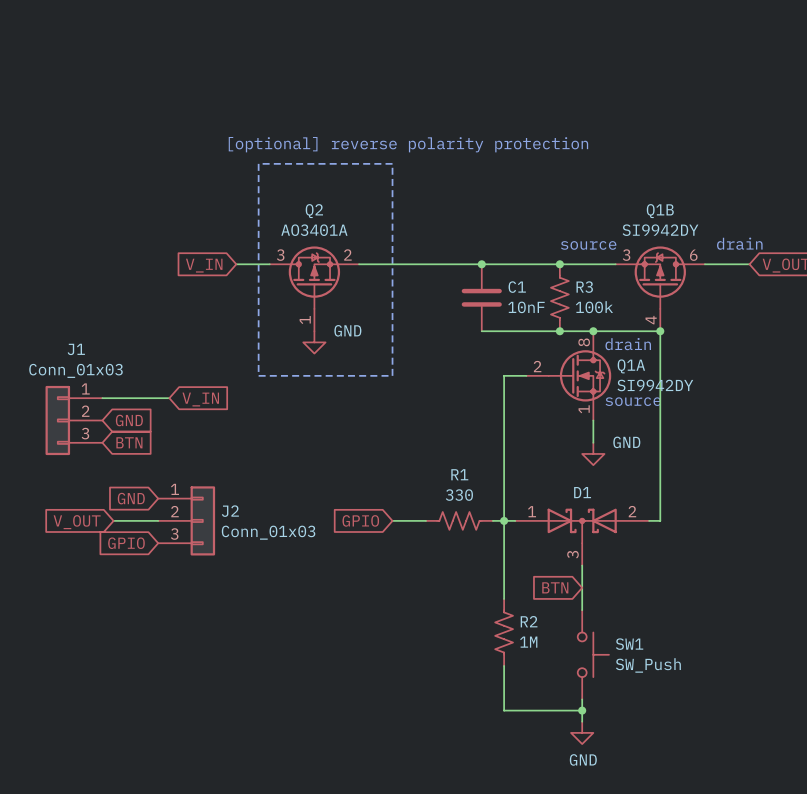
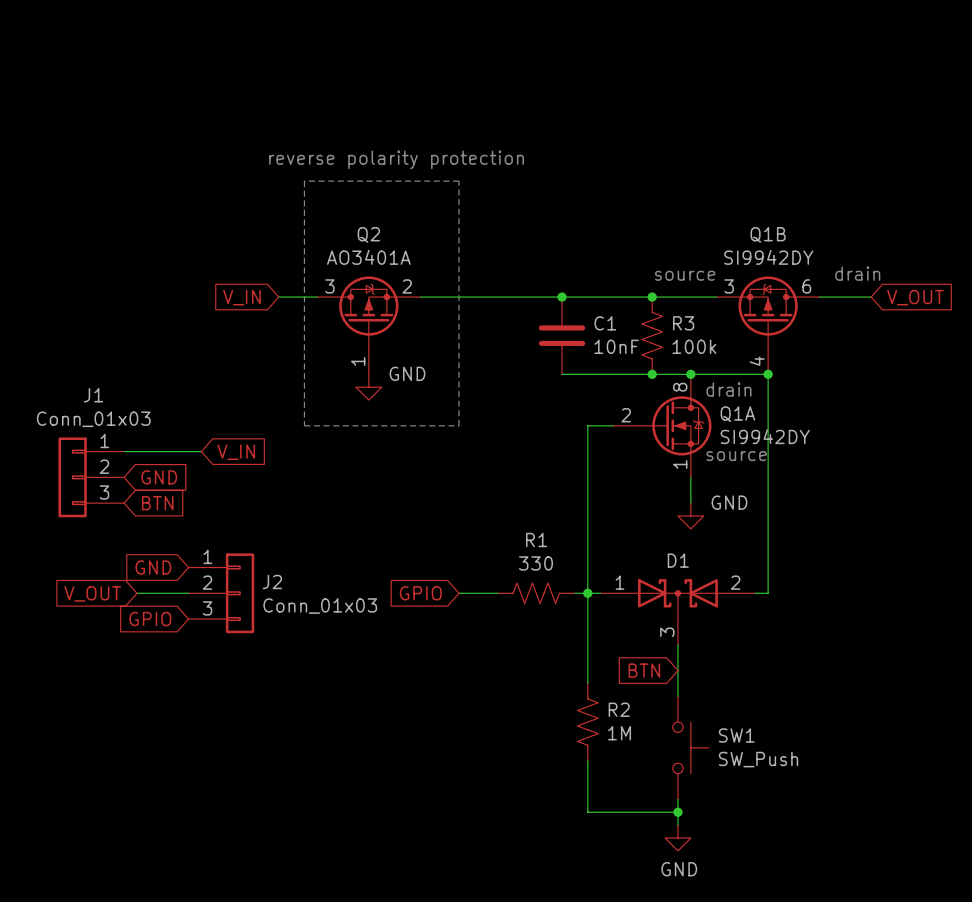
text: [optional] reverse polarity protection (408, 144) -> reverse polarity protection (396, 159)

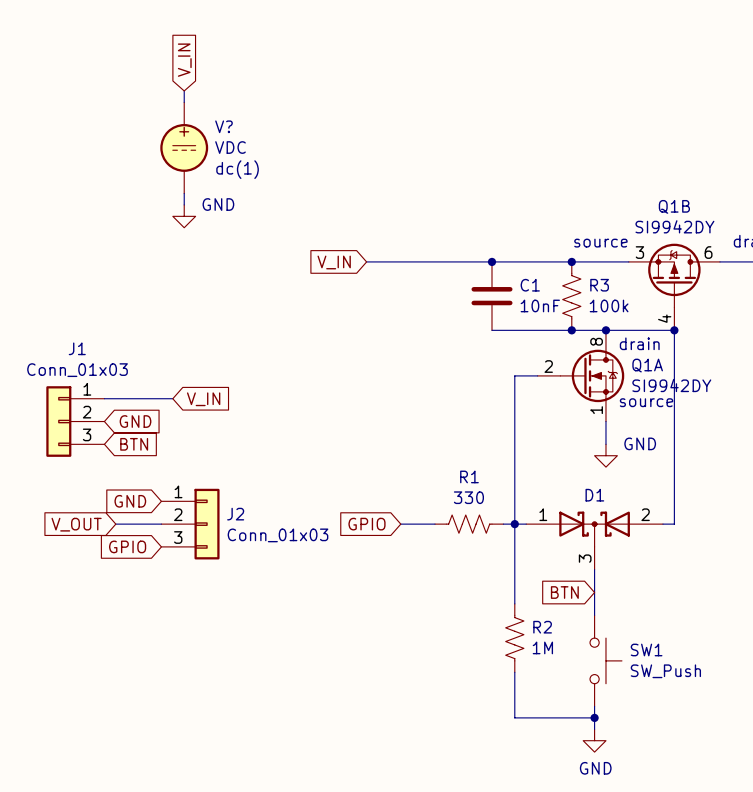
global label: none -> V_IN (184, 60)
wire: none -> (184, 90) (184, 102)
text: reverse polarity protection (396, 159) -> none
V?: none -> VDC (184, 147)
line: (304, 181) (304, 425) (459, 425) (459, 181) (304, 181) -> none
wire: none -> (184, 193) (184, 204)
global label: V_IN (242, 297) -> none
wire: (278, 297) (317, 297) -> none
global label: none -> V_IN (334, 262)
Q2: AO3401A (368, 325) -> none
power symbol position: GND (368, 387) -> GND (184, 216)

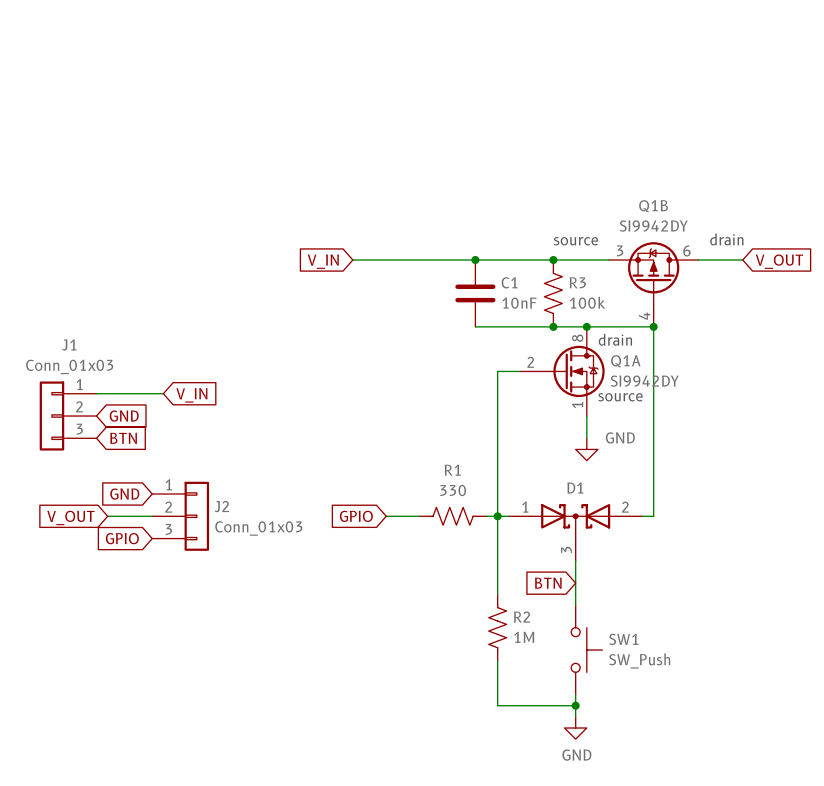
global label: V_IN (184, 60) -> none
wire: (184, 90) (184, 102) -> none
V?: VDC (184, 147) -> none
wire: (184, 193) (184, 204) -> none
power symbol: GND (184, 216) -> none

